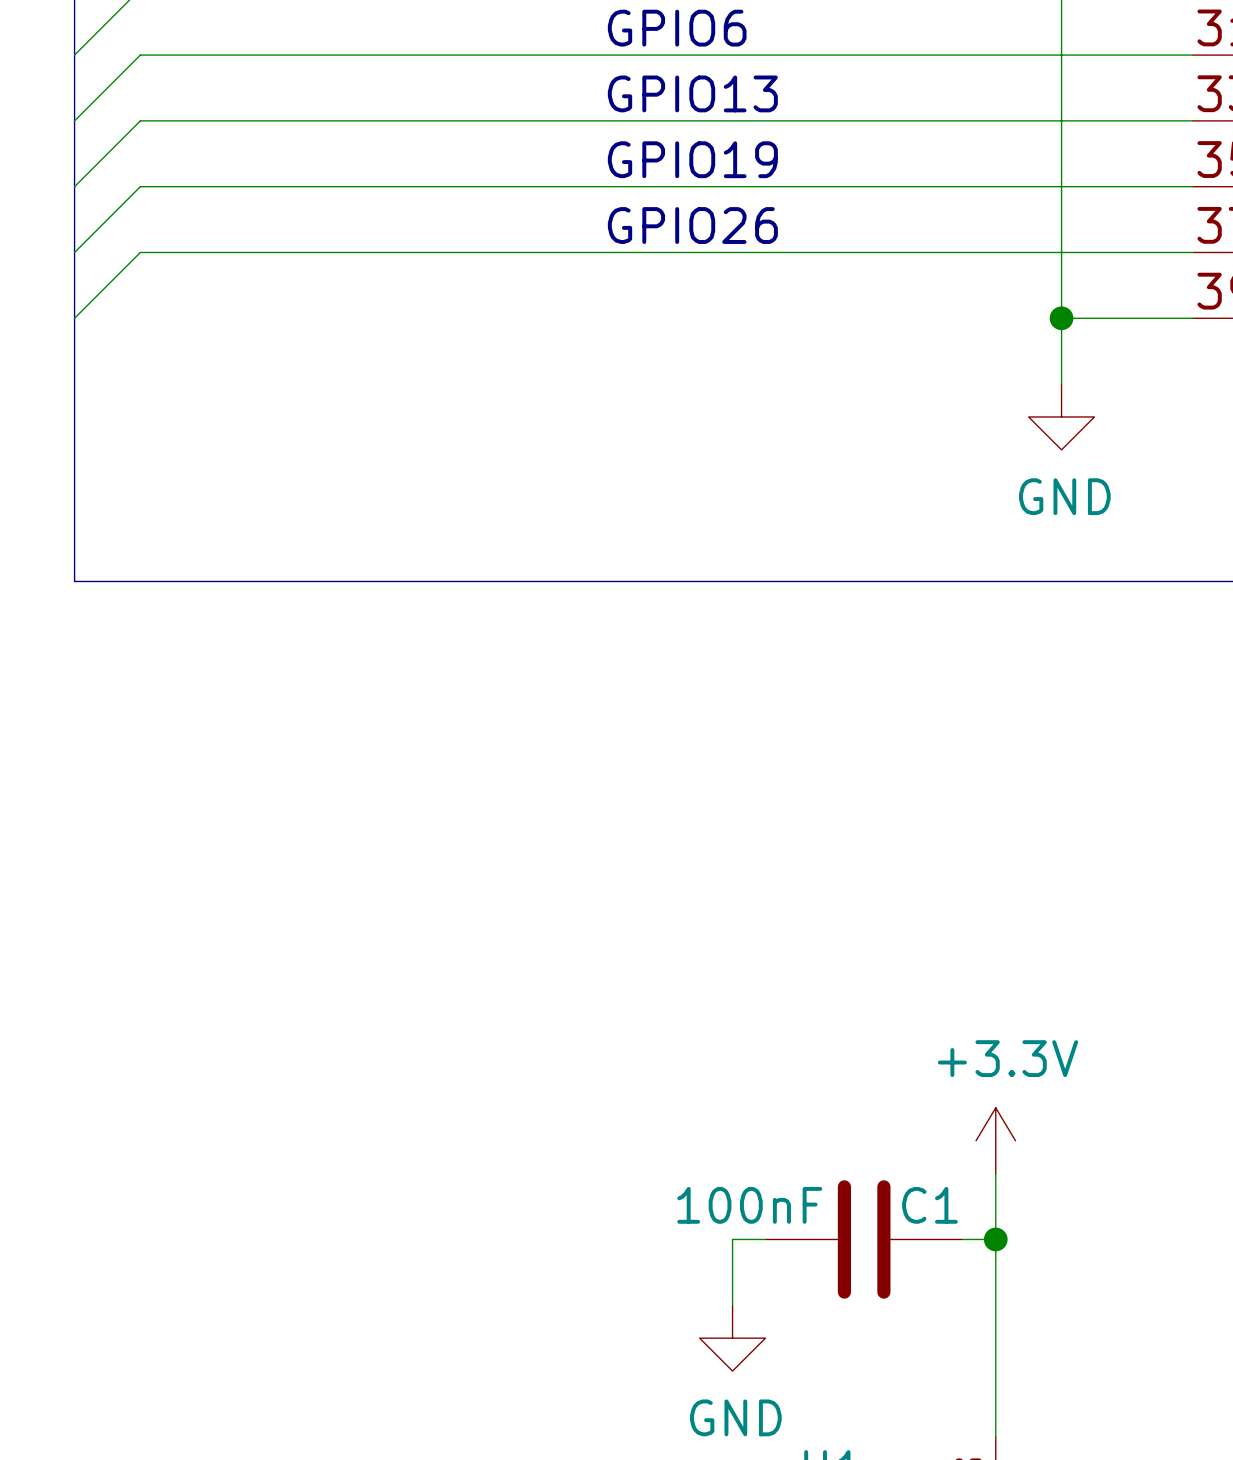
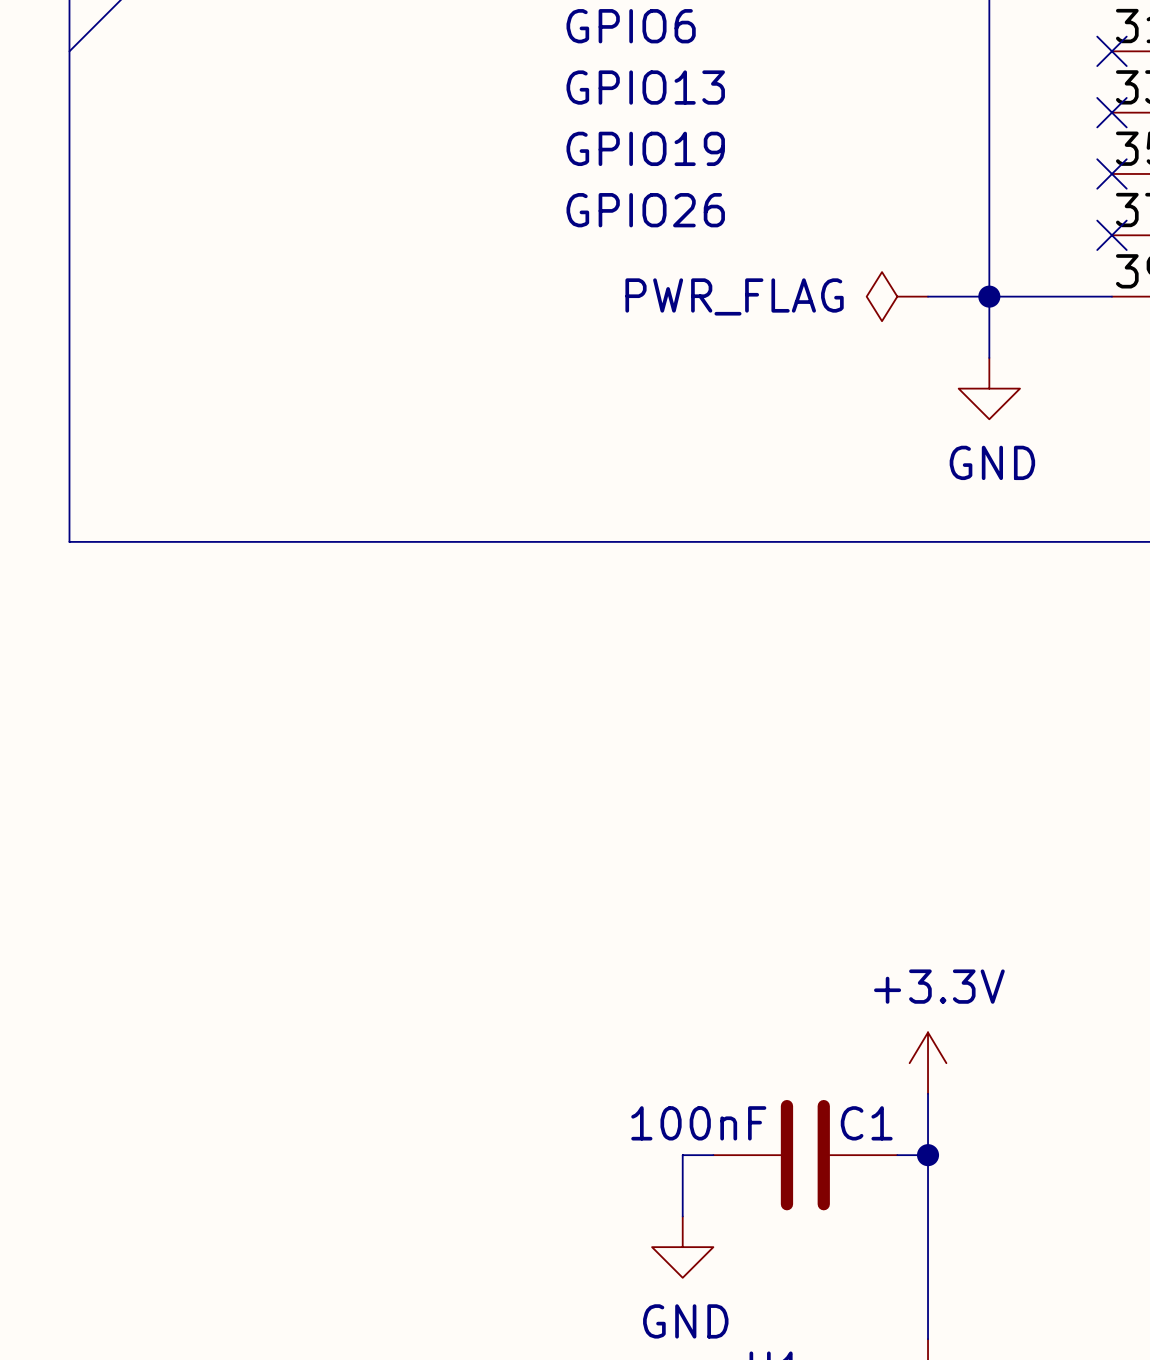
wire: (1193, 55) (140, 55) (74, 120) -> none
no-connect mark: none -> (1111, 51)
wire: (1193, 120) (140, 120) (74, 186) -> none
no-connect mark: none -> (1111, 112)
wire: (1193, 186) (140, 186) (74, 252) -> none
no-connect mark: none -> (1111, 173)
wire: (1193, 252) (140, 252) (74, 318) -> none
no-connect mark: none -> (1111, 235)
power symbol: none -> PWR_FLAG (897, 296)
wire: none -> (928, 296) (989, 296)

